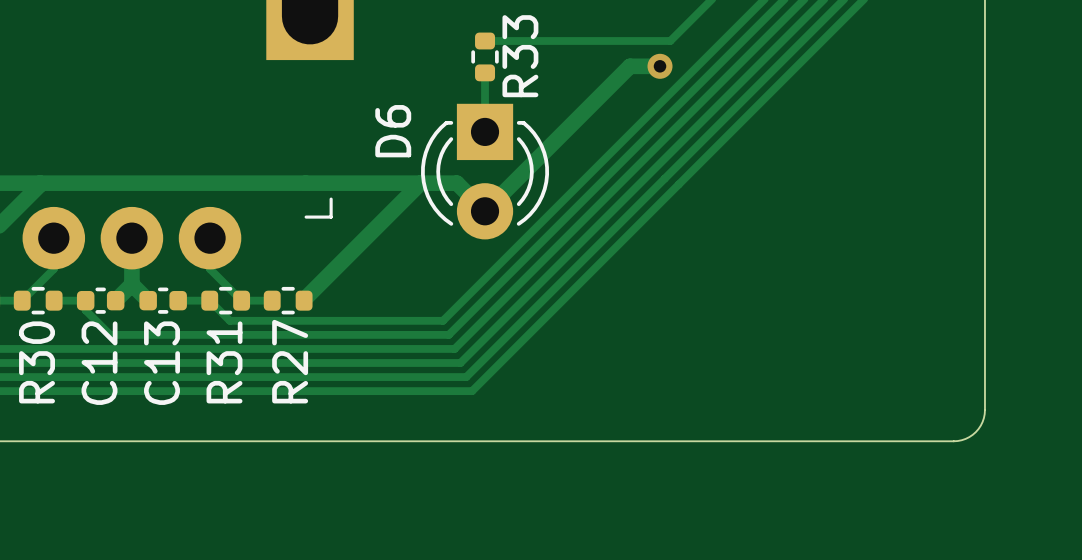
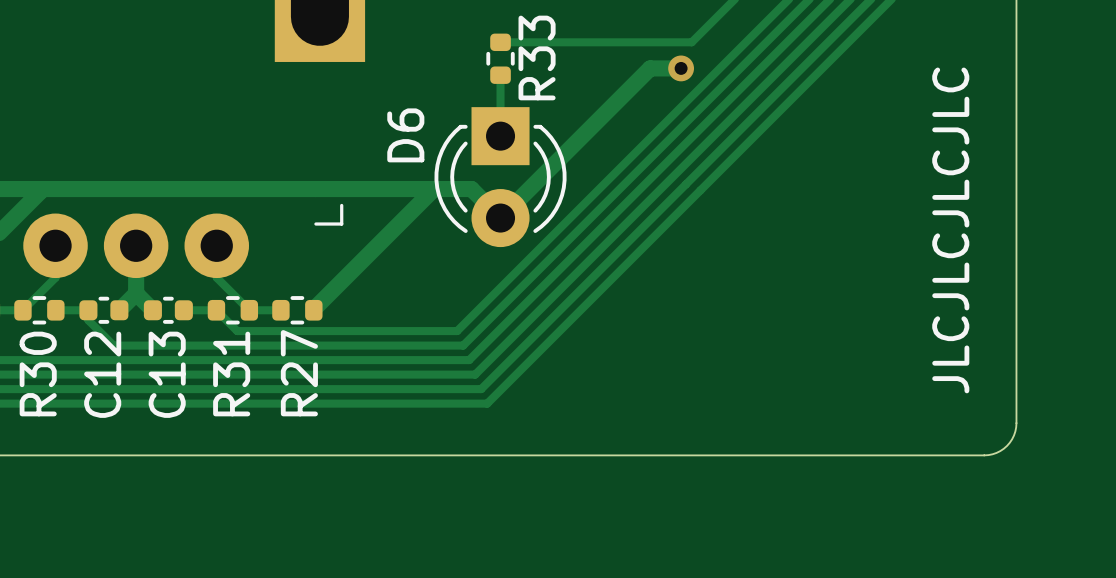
text: none -> JLCJLCJLCJLC (950, 230)

